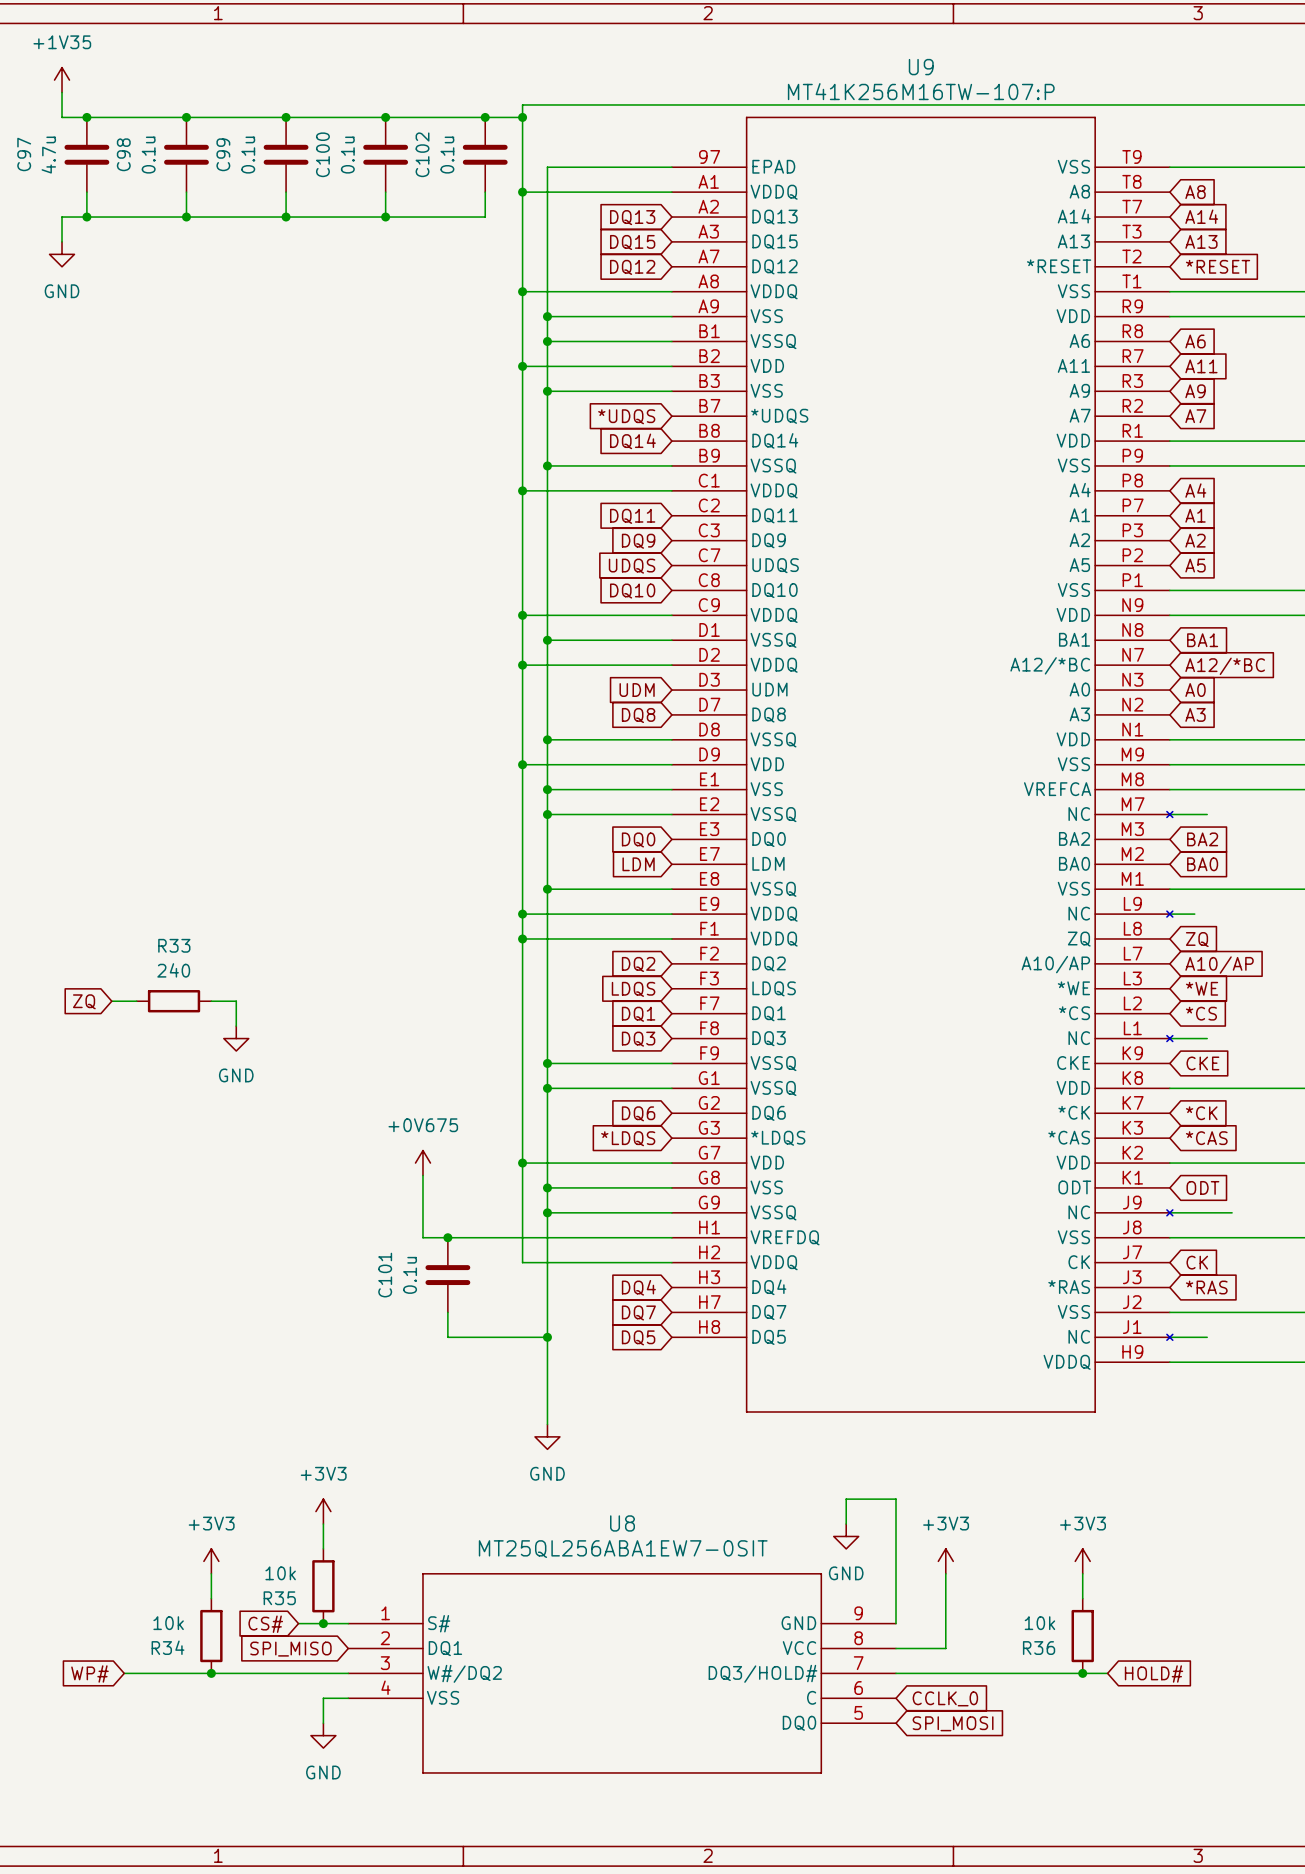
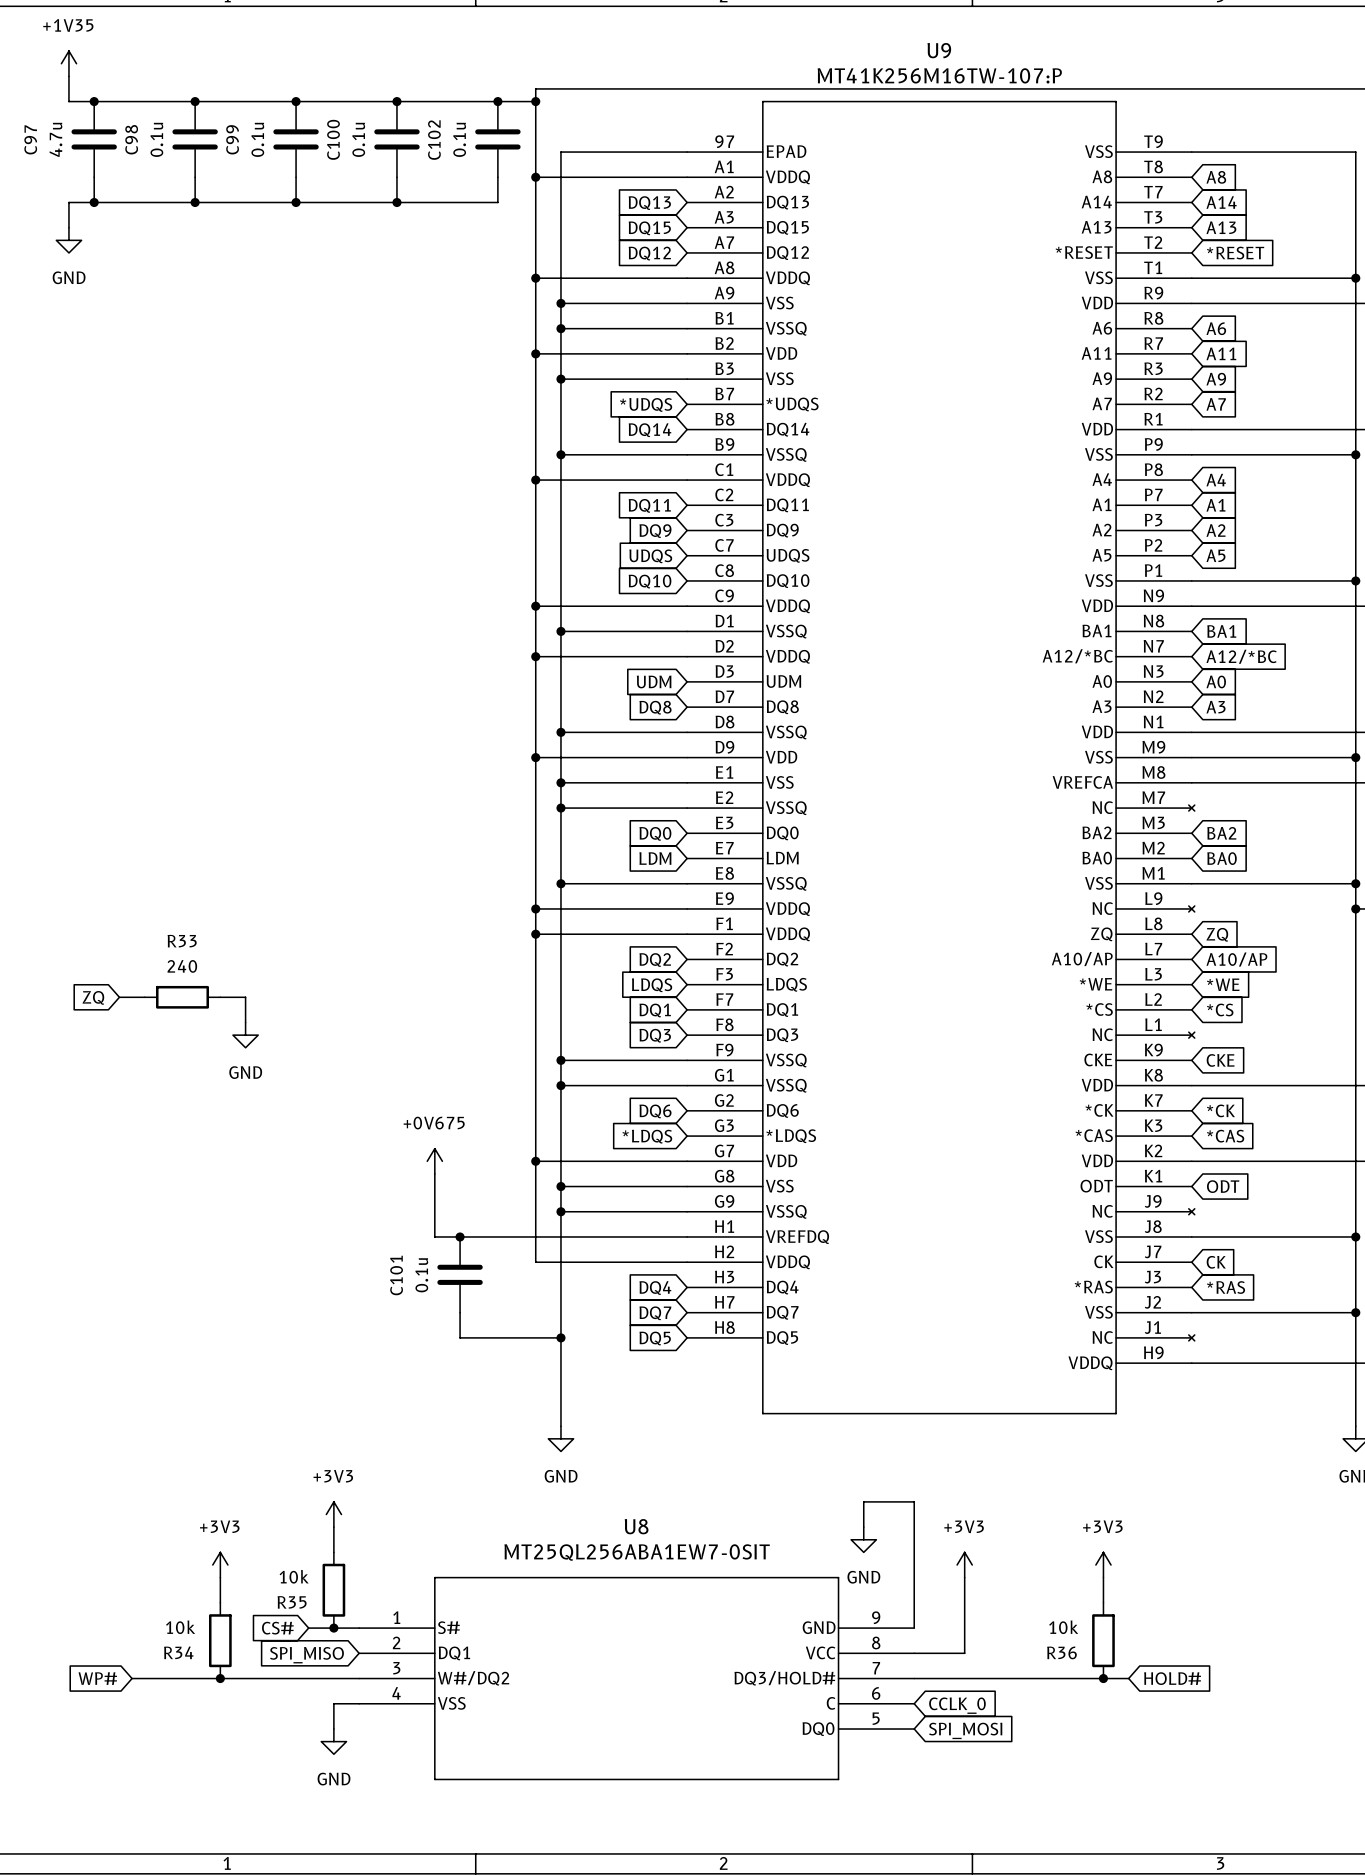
wire: (1169, 814) (1207, 814) -> none
wire: (1169, 914) (1194, 914) -> none
wire: (1169, 1038) (1207, 1038) -> none
wire: (1169, 1212) (1232, 1212) -> none
wire: (1169, 1337) (1207, 1337) -> none

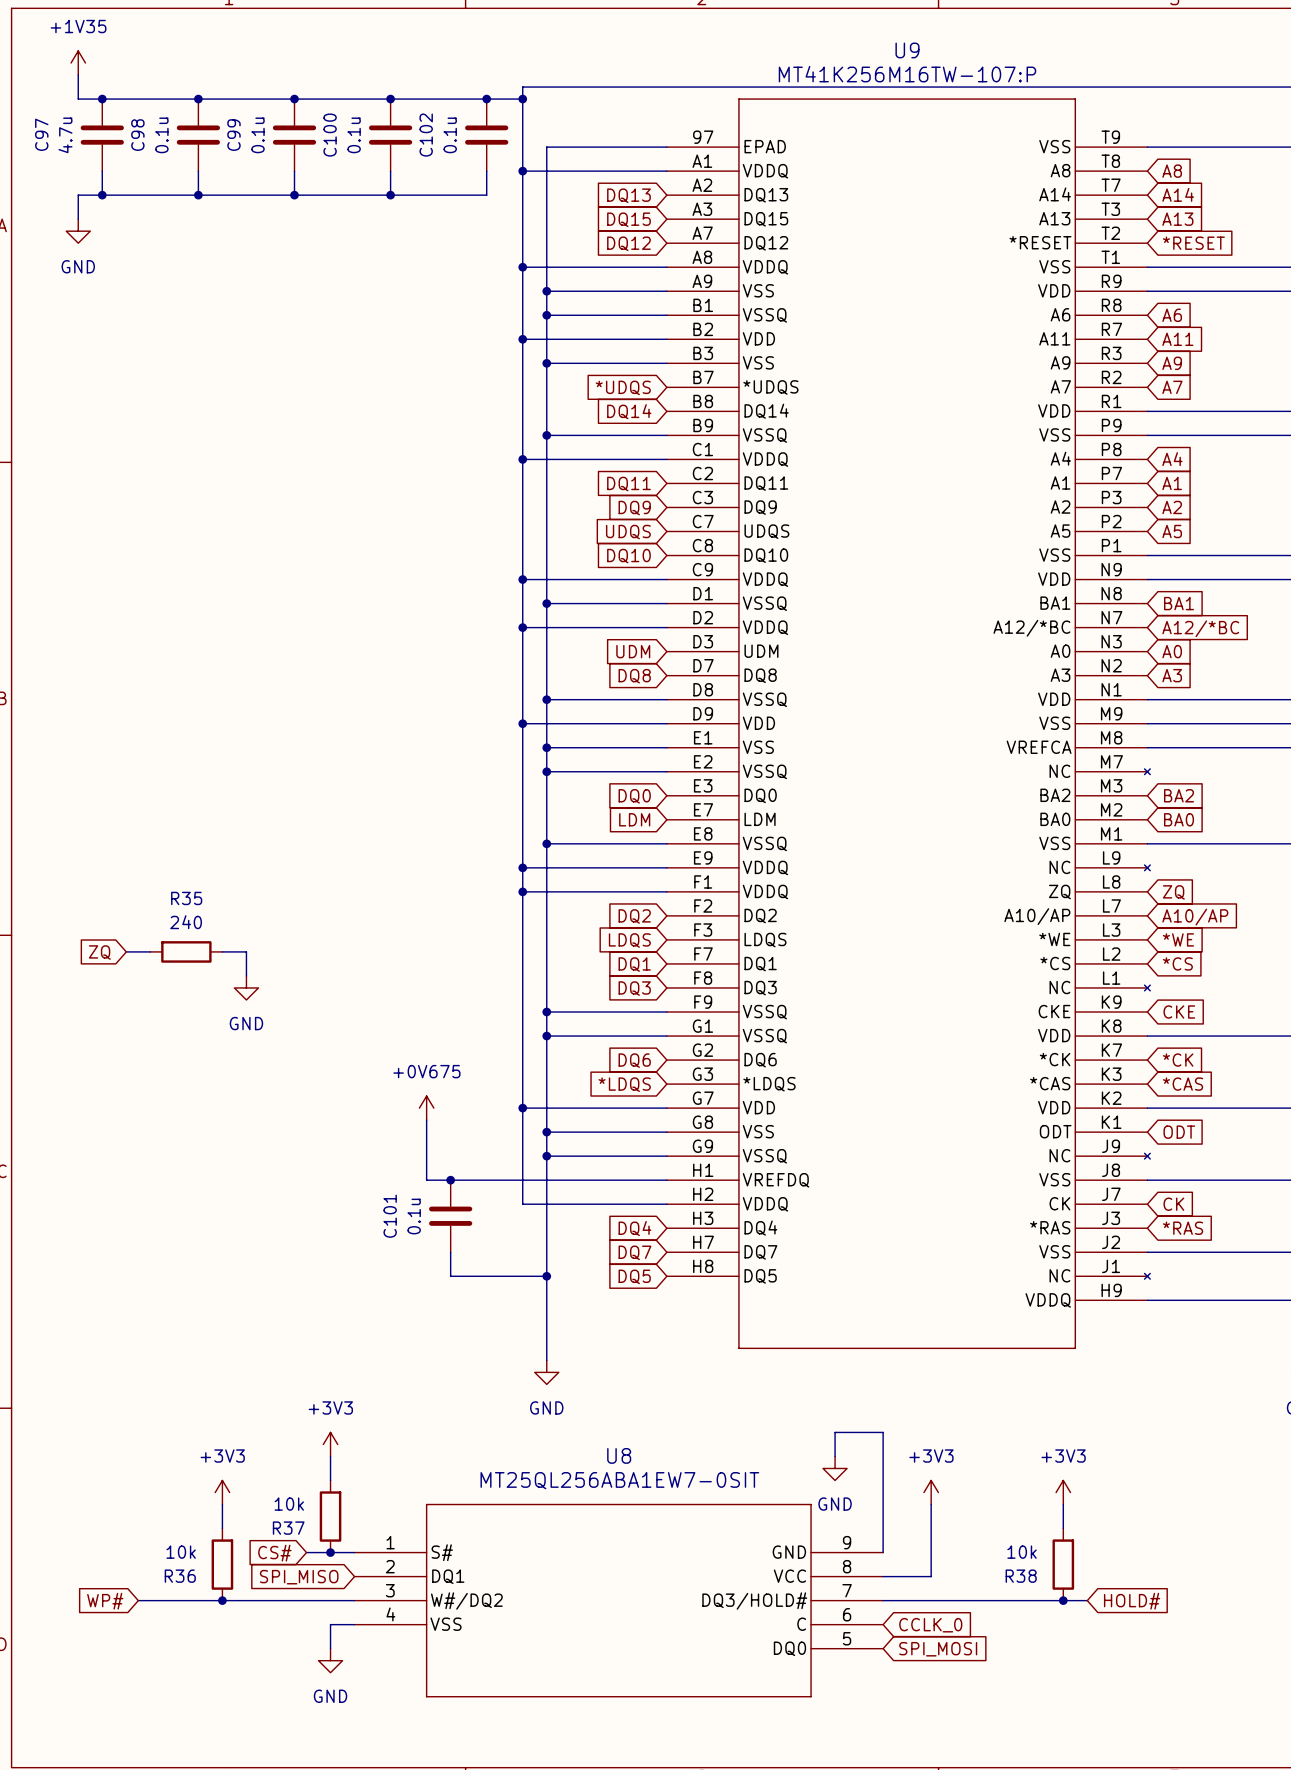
R33 name: R33 (182, 941) -> R35 (186, 898)
R35 name: R35 (292, 1602) -> R37 (288, 1528)
R34 name: R34 (178, 1652) -> R36 (180, 1576)
R36 name: R36 (1061, 1652) -> R38 (1021, 1576)

